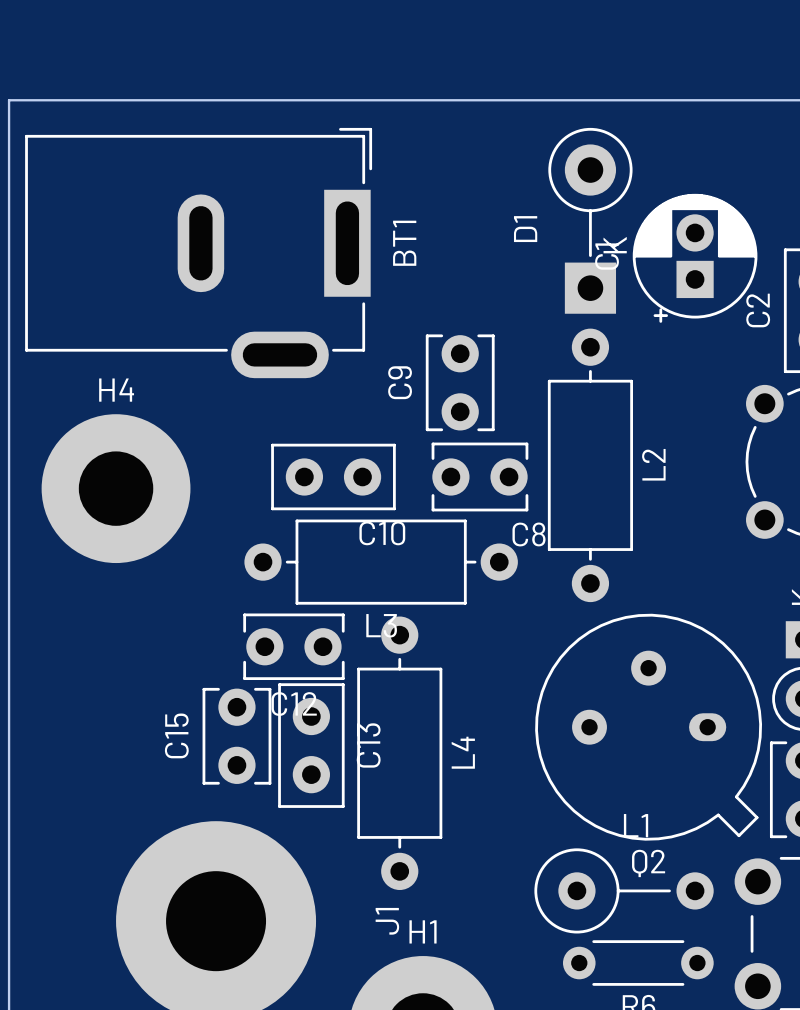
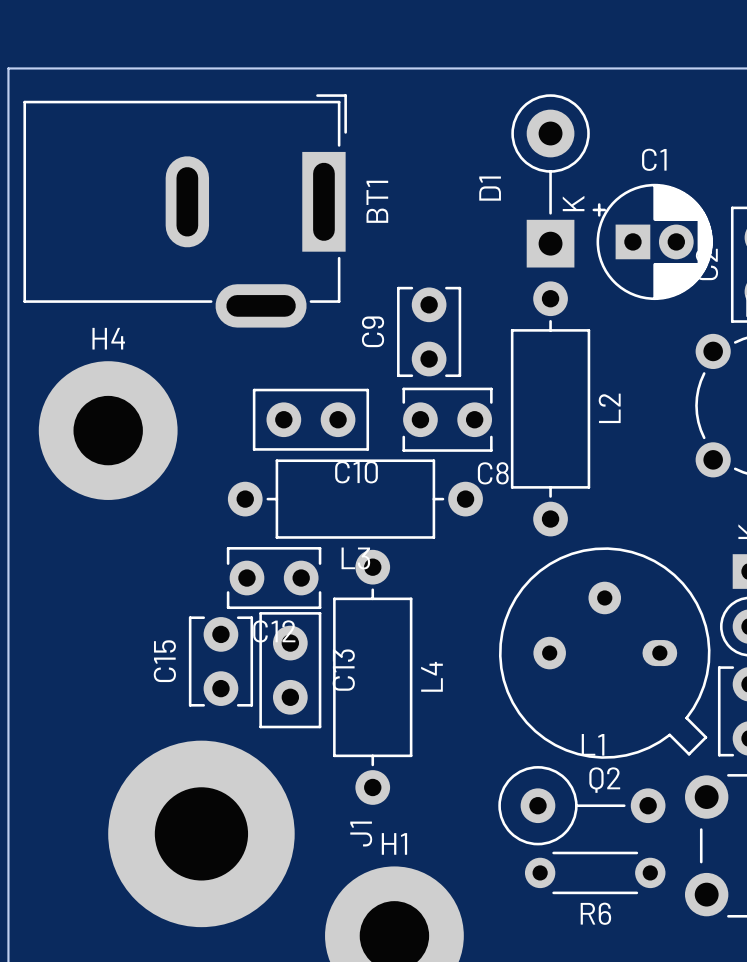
C1 rotation: 0° (695, 258) -> 90° clockwise (652, 241)

